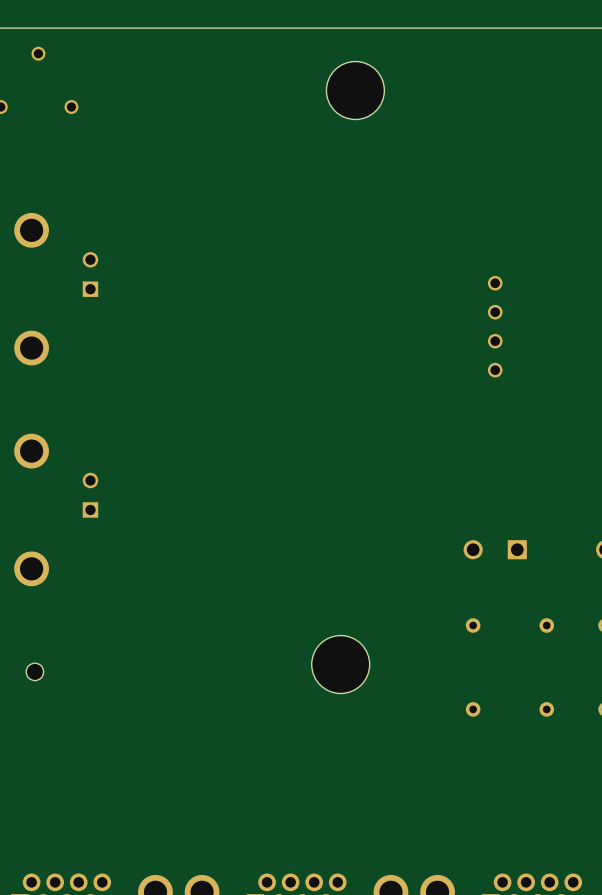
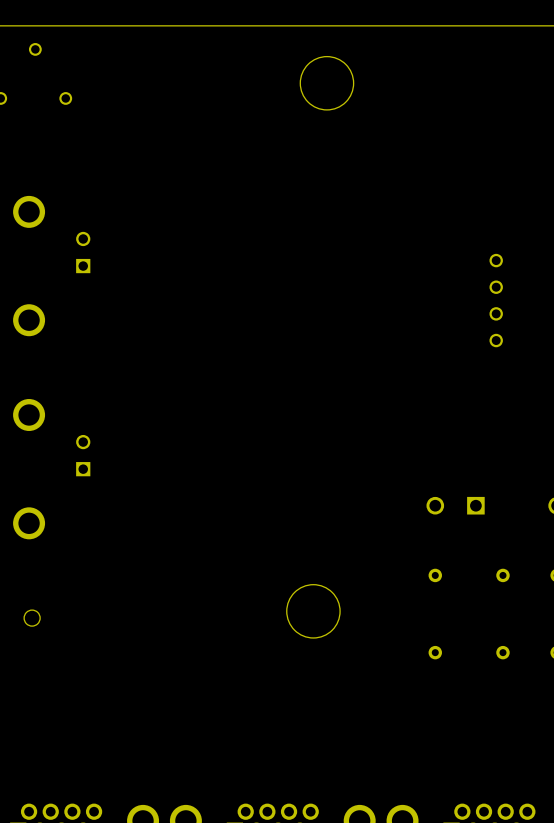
part position: (495, 326) -> (496, 300)

